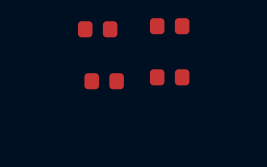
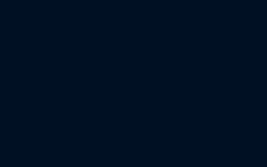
part: (169, 26) -> none
part: (97, 29) -> none
part: (169, 77) -> none
part: (104, 81) -> none

